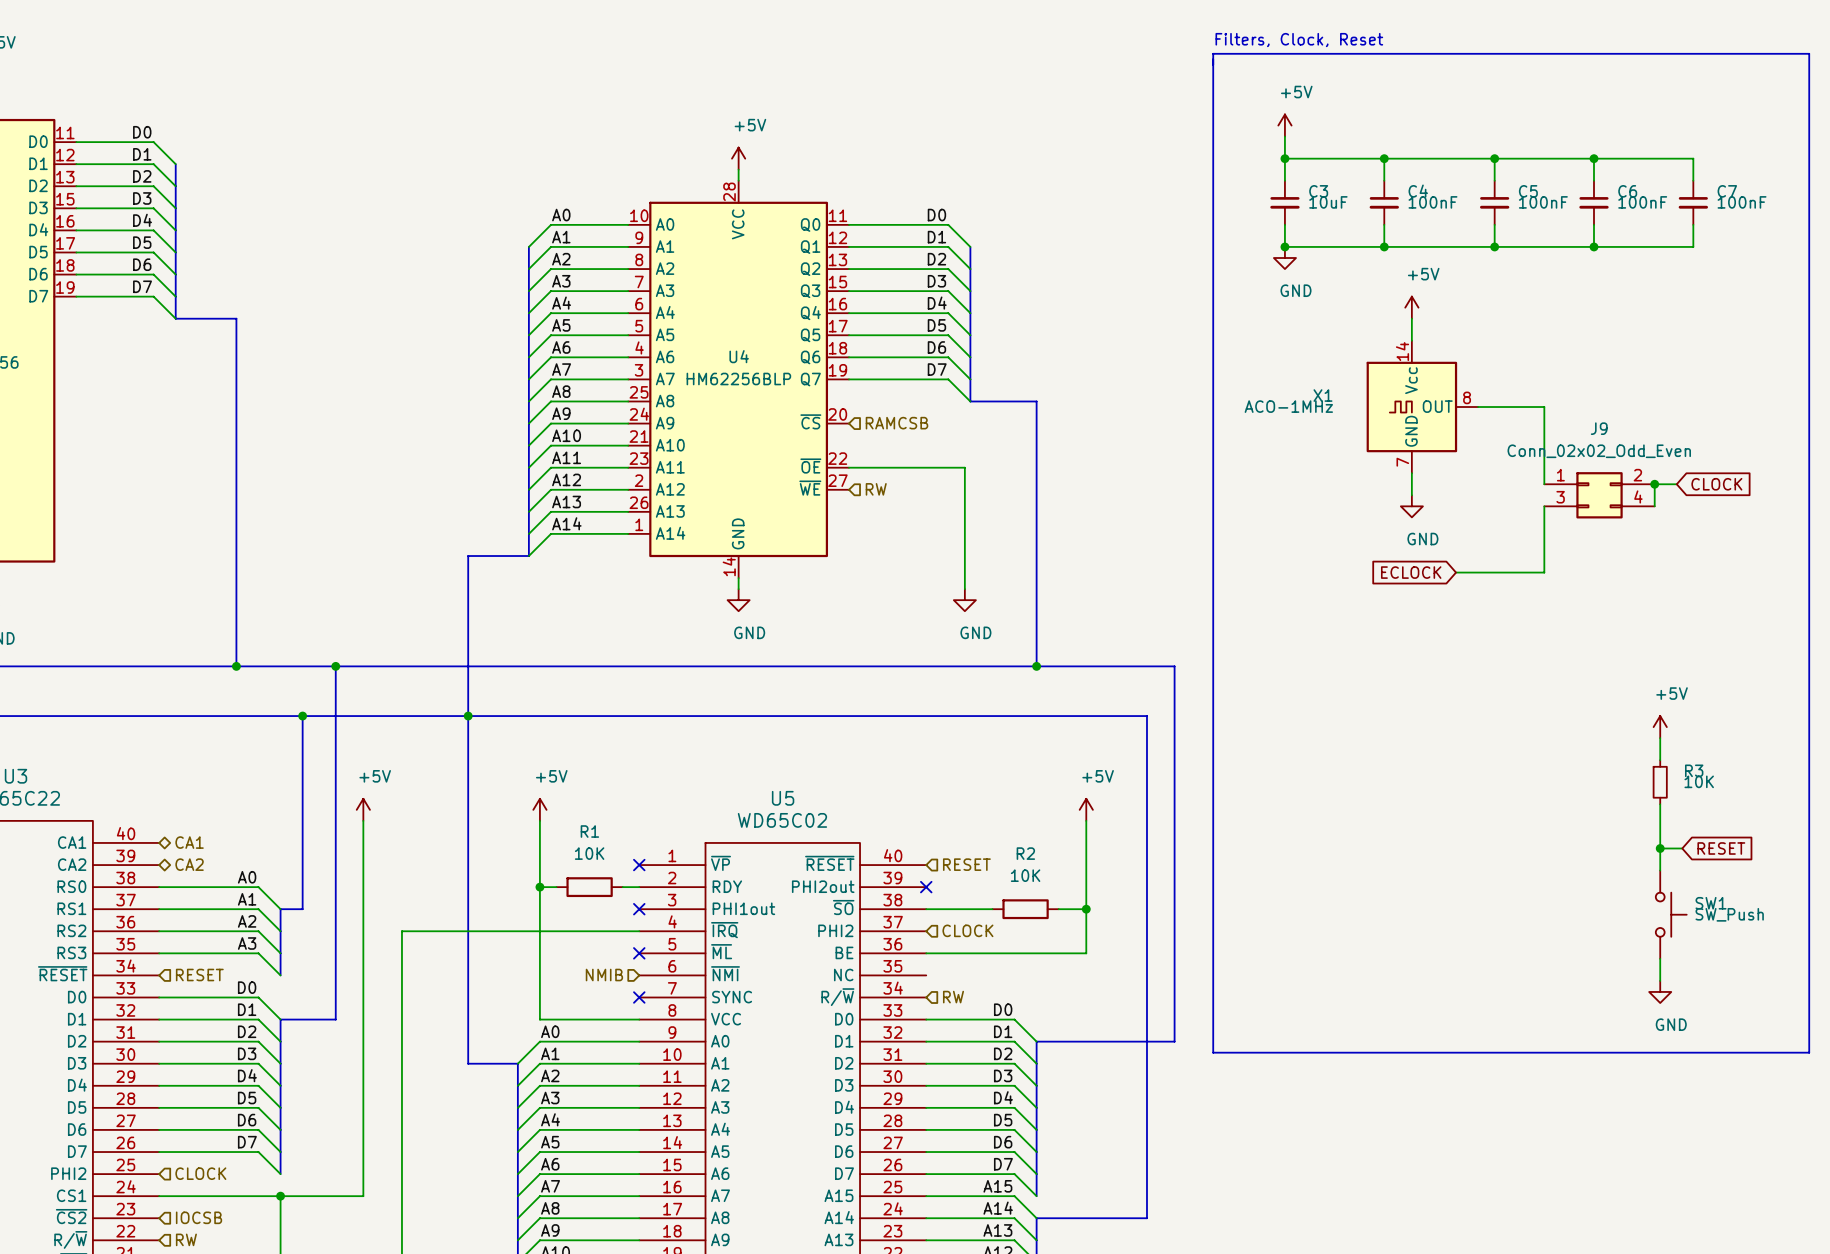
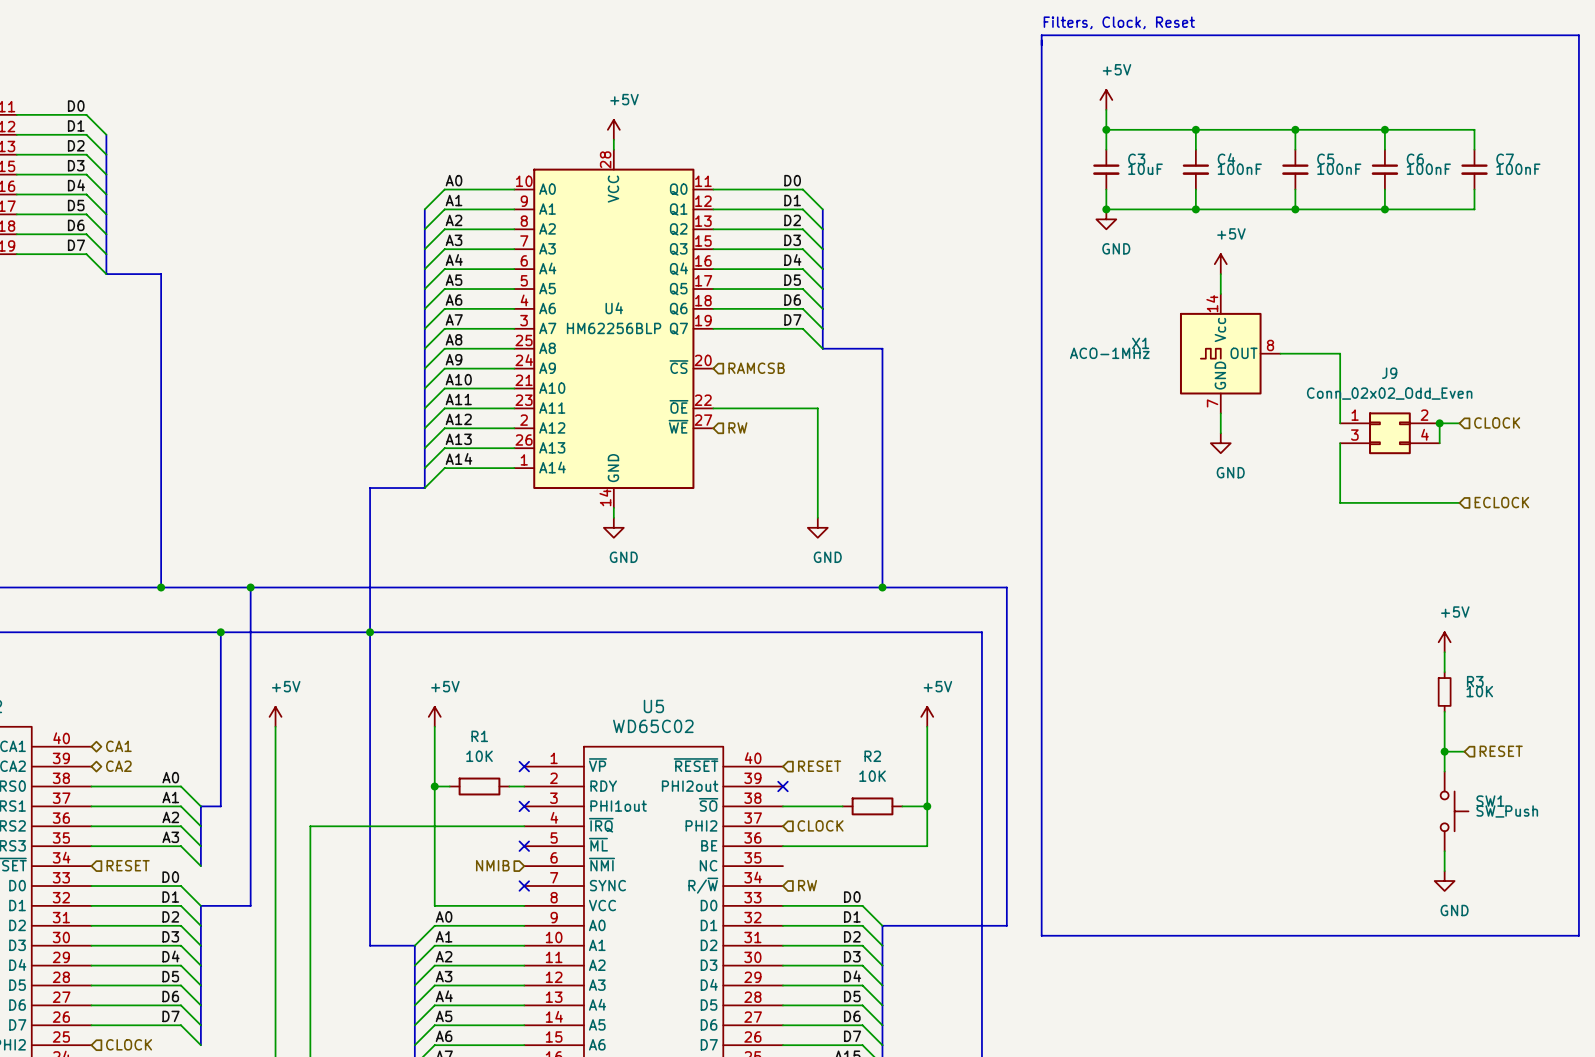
hierarchical label: none -> CLOCK (1497, 422)
global label: CLOCK (1716, 484) -> none
global label: ECLOCK (1411, 572) -> none
wire: (1456, 572) (1544, 572) -> (1459, 502) (1340, 502)
hierarchical label: none -> ECLOCK (1501, 502)
global label: RESET (1721, 848) -> none
hierarchical label: none -> RESET (1501, 751)

